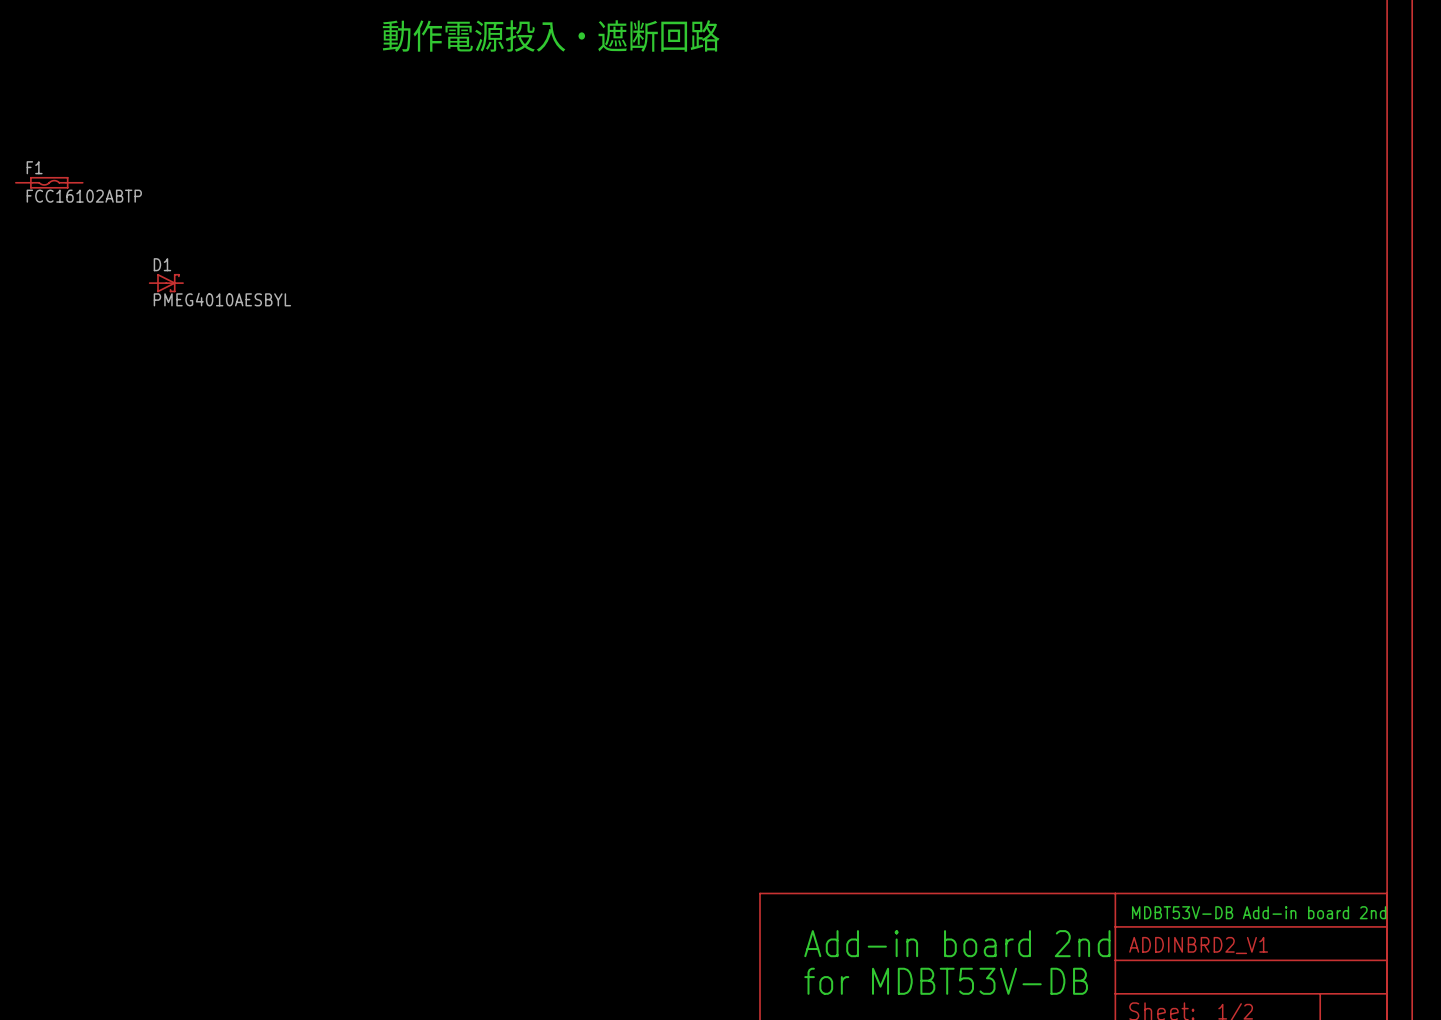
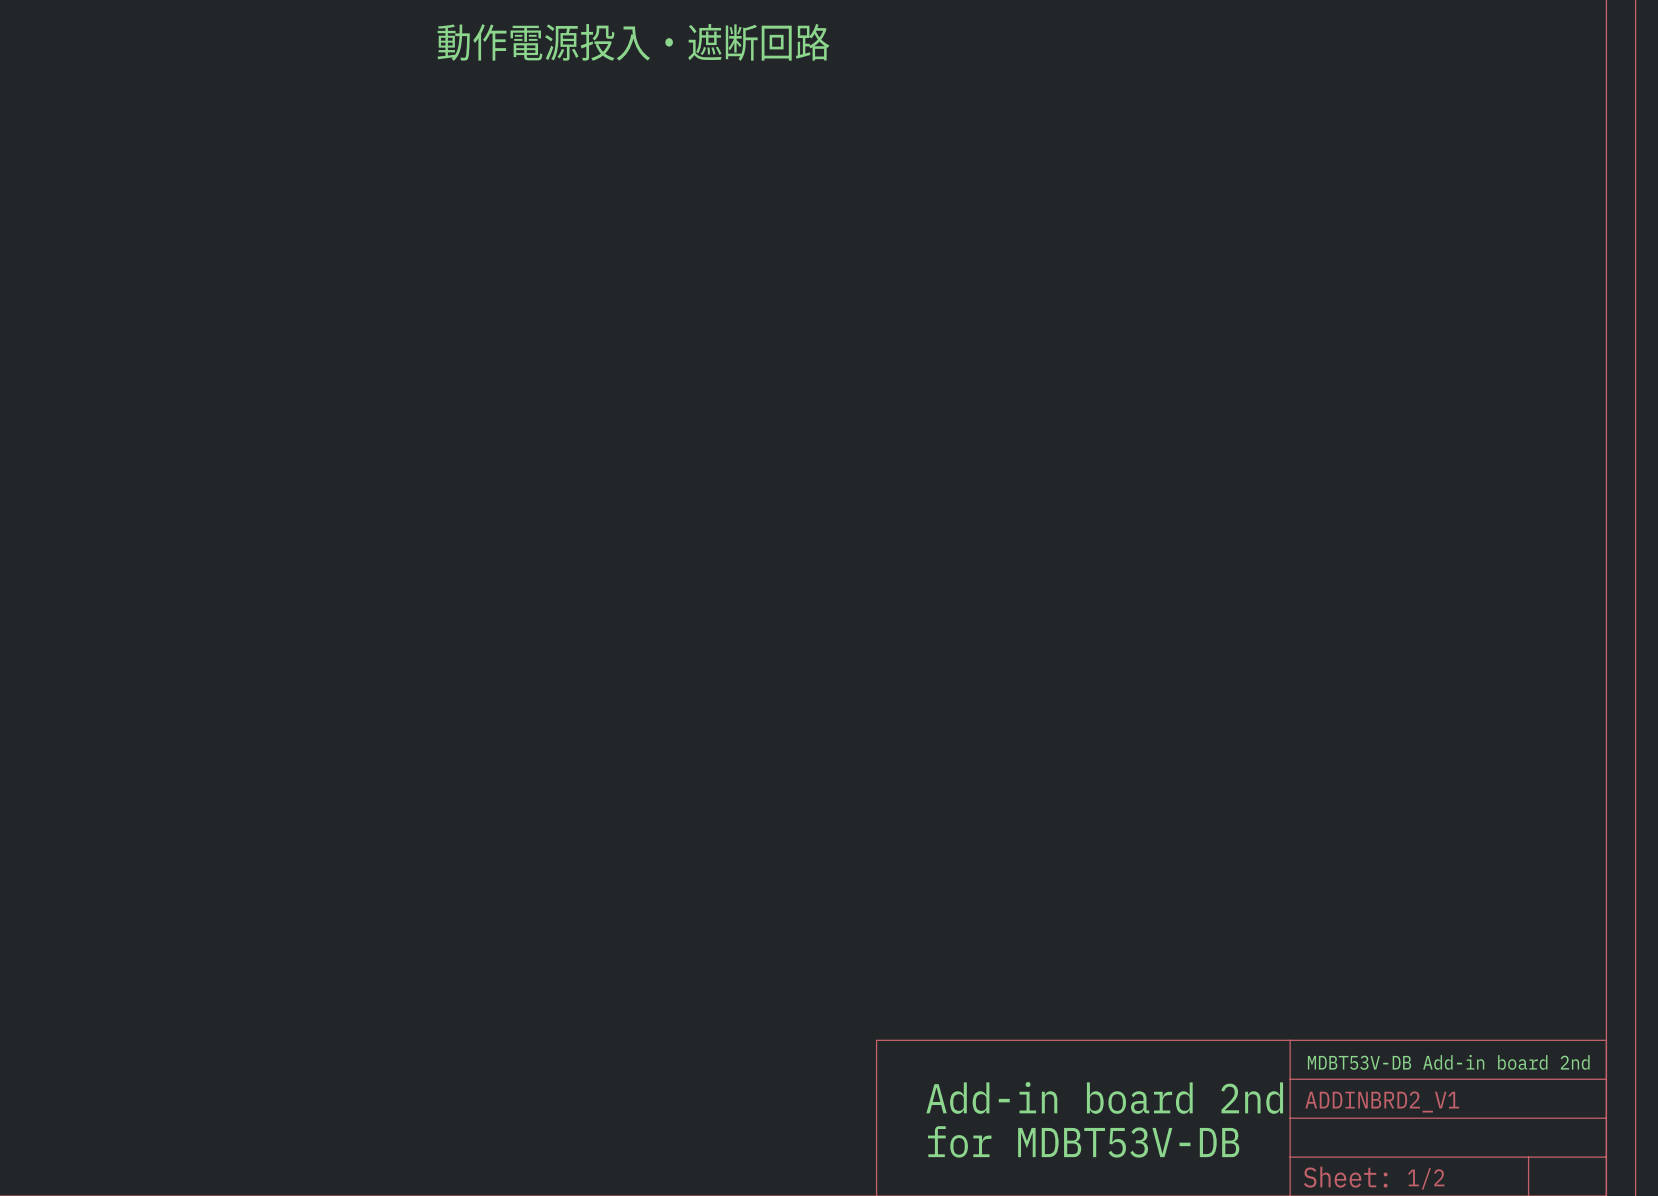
F1: FCC16102ABTP (49, 182) -> none
D1: PMEG4010AESBYL (166, 283) -> none

